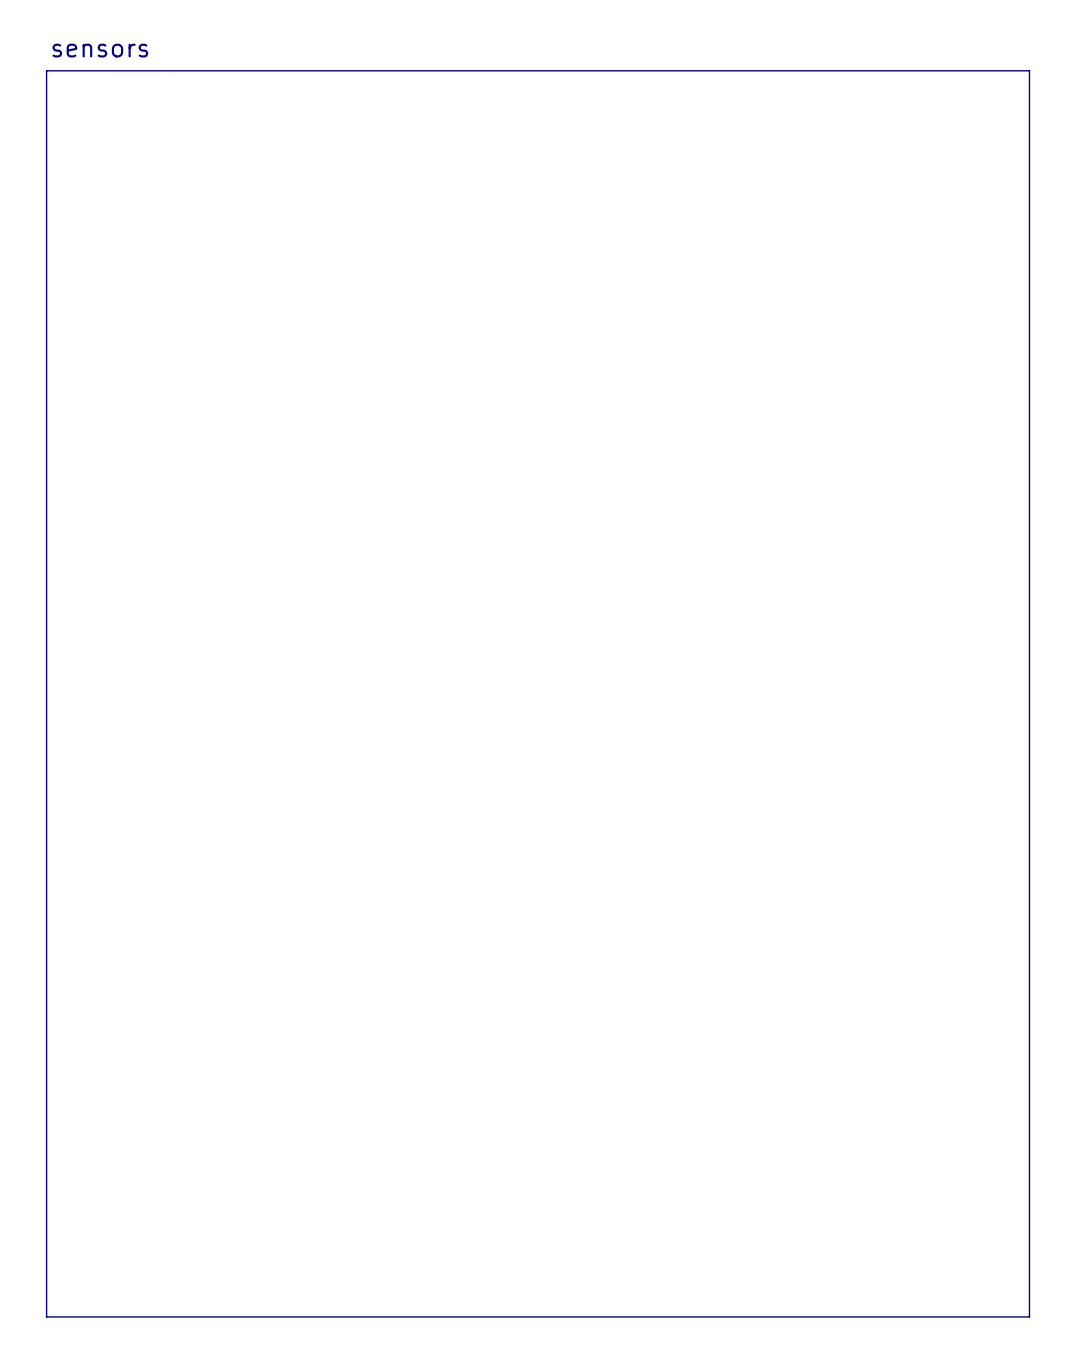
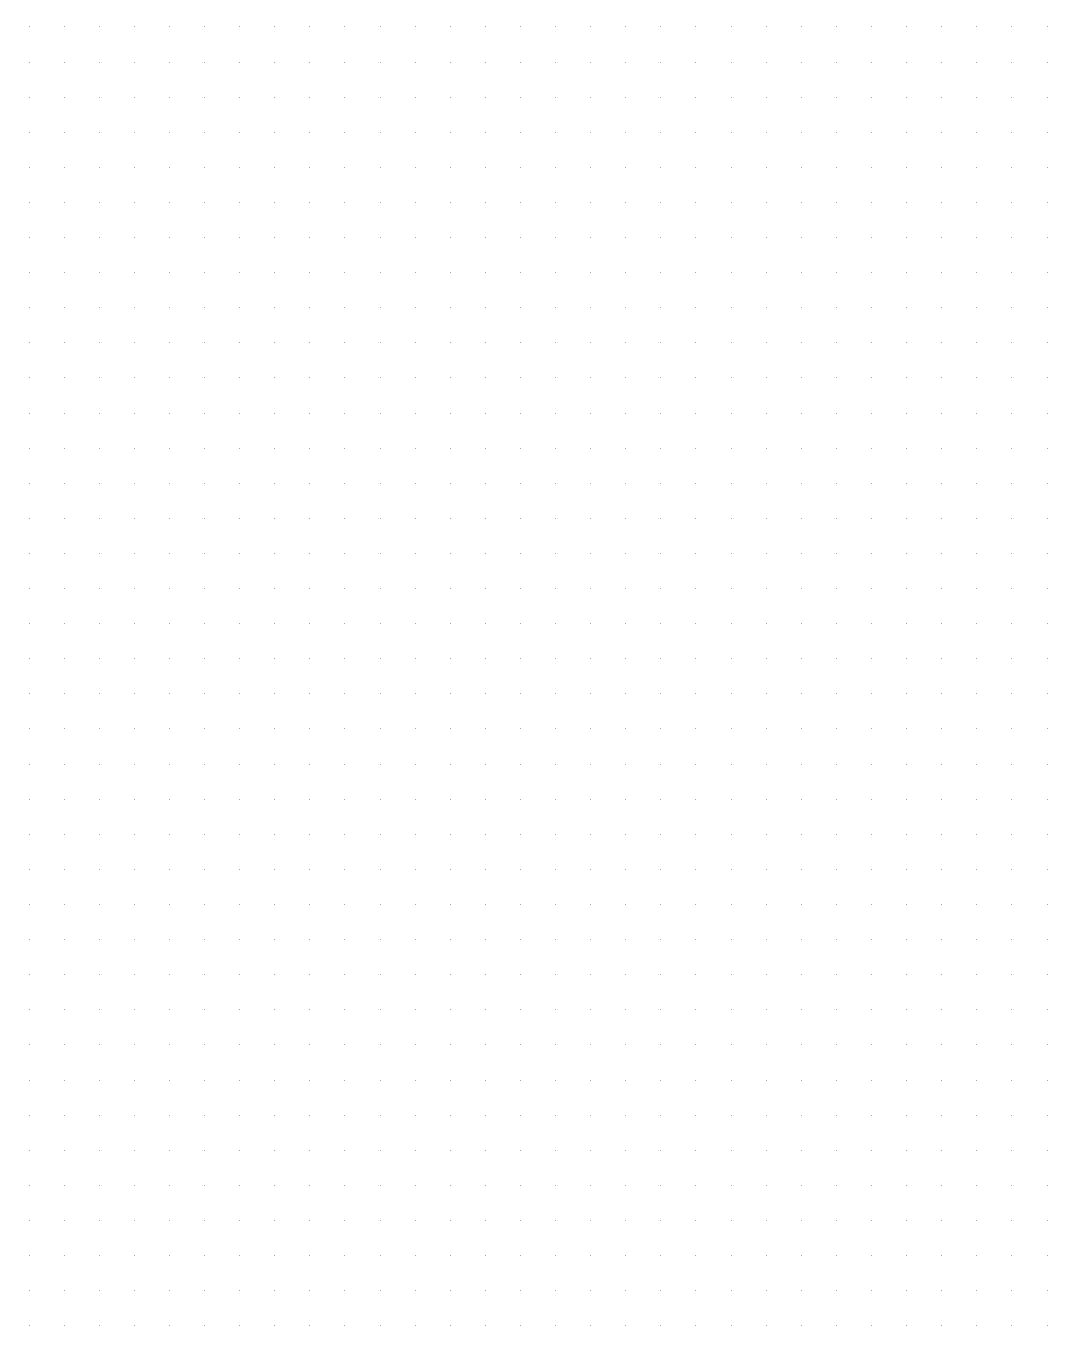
text: sensors (100, 50) -> none
line: (46, 70) (1029, 70) (1029, 1316) (46, 1316) (46, 70) -> none

